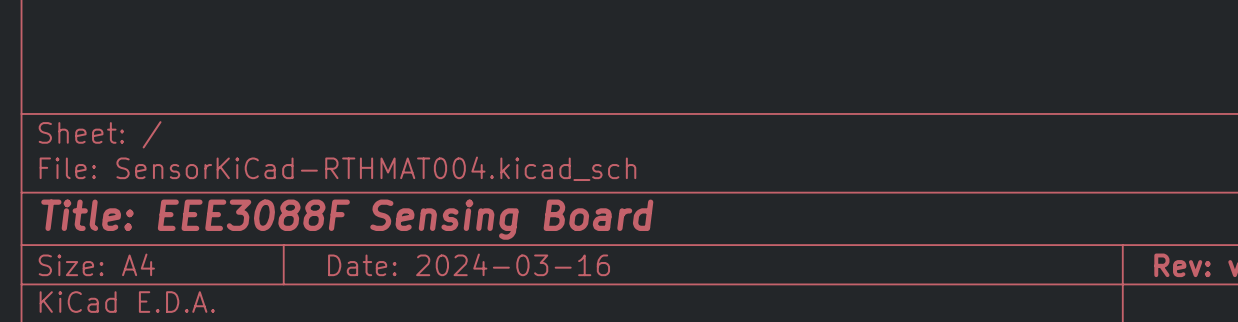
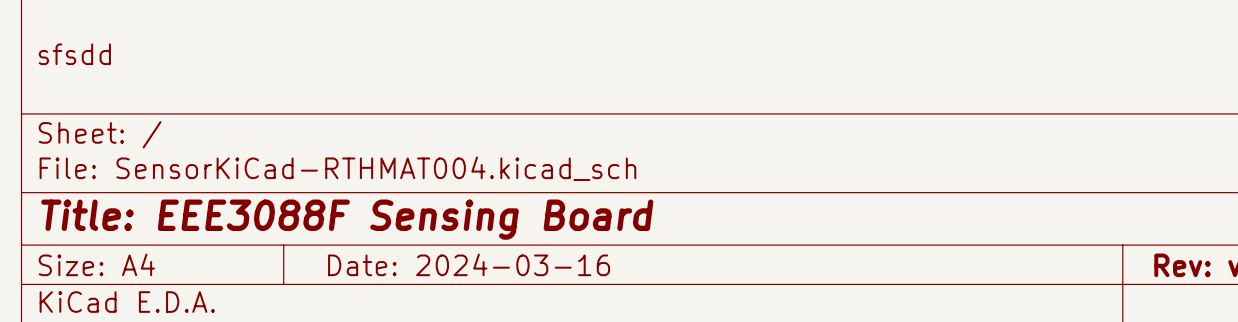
title block: none -> sfsdd (74, 54)

